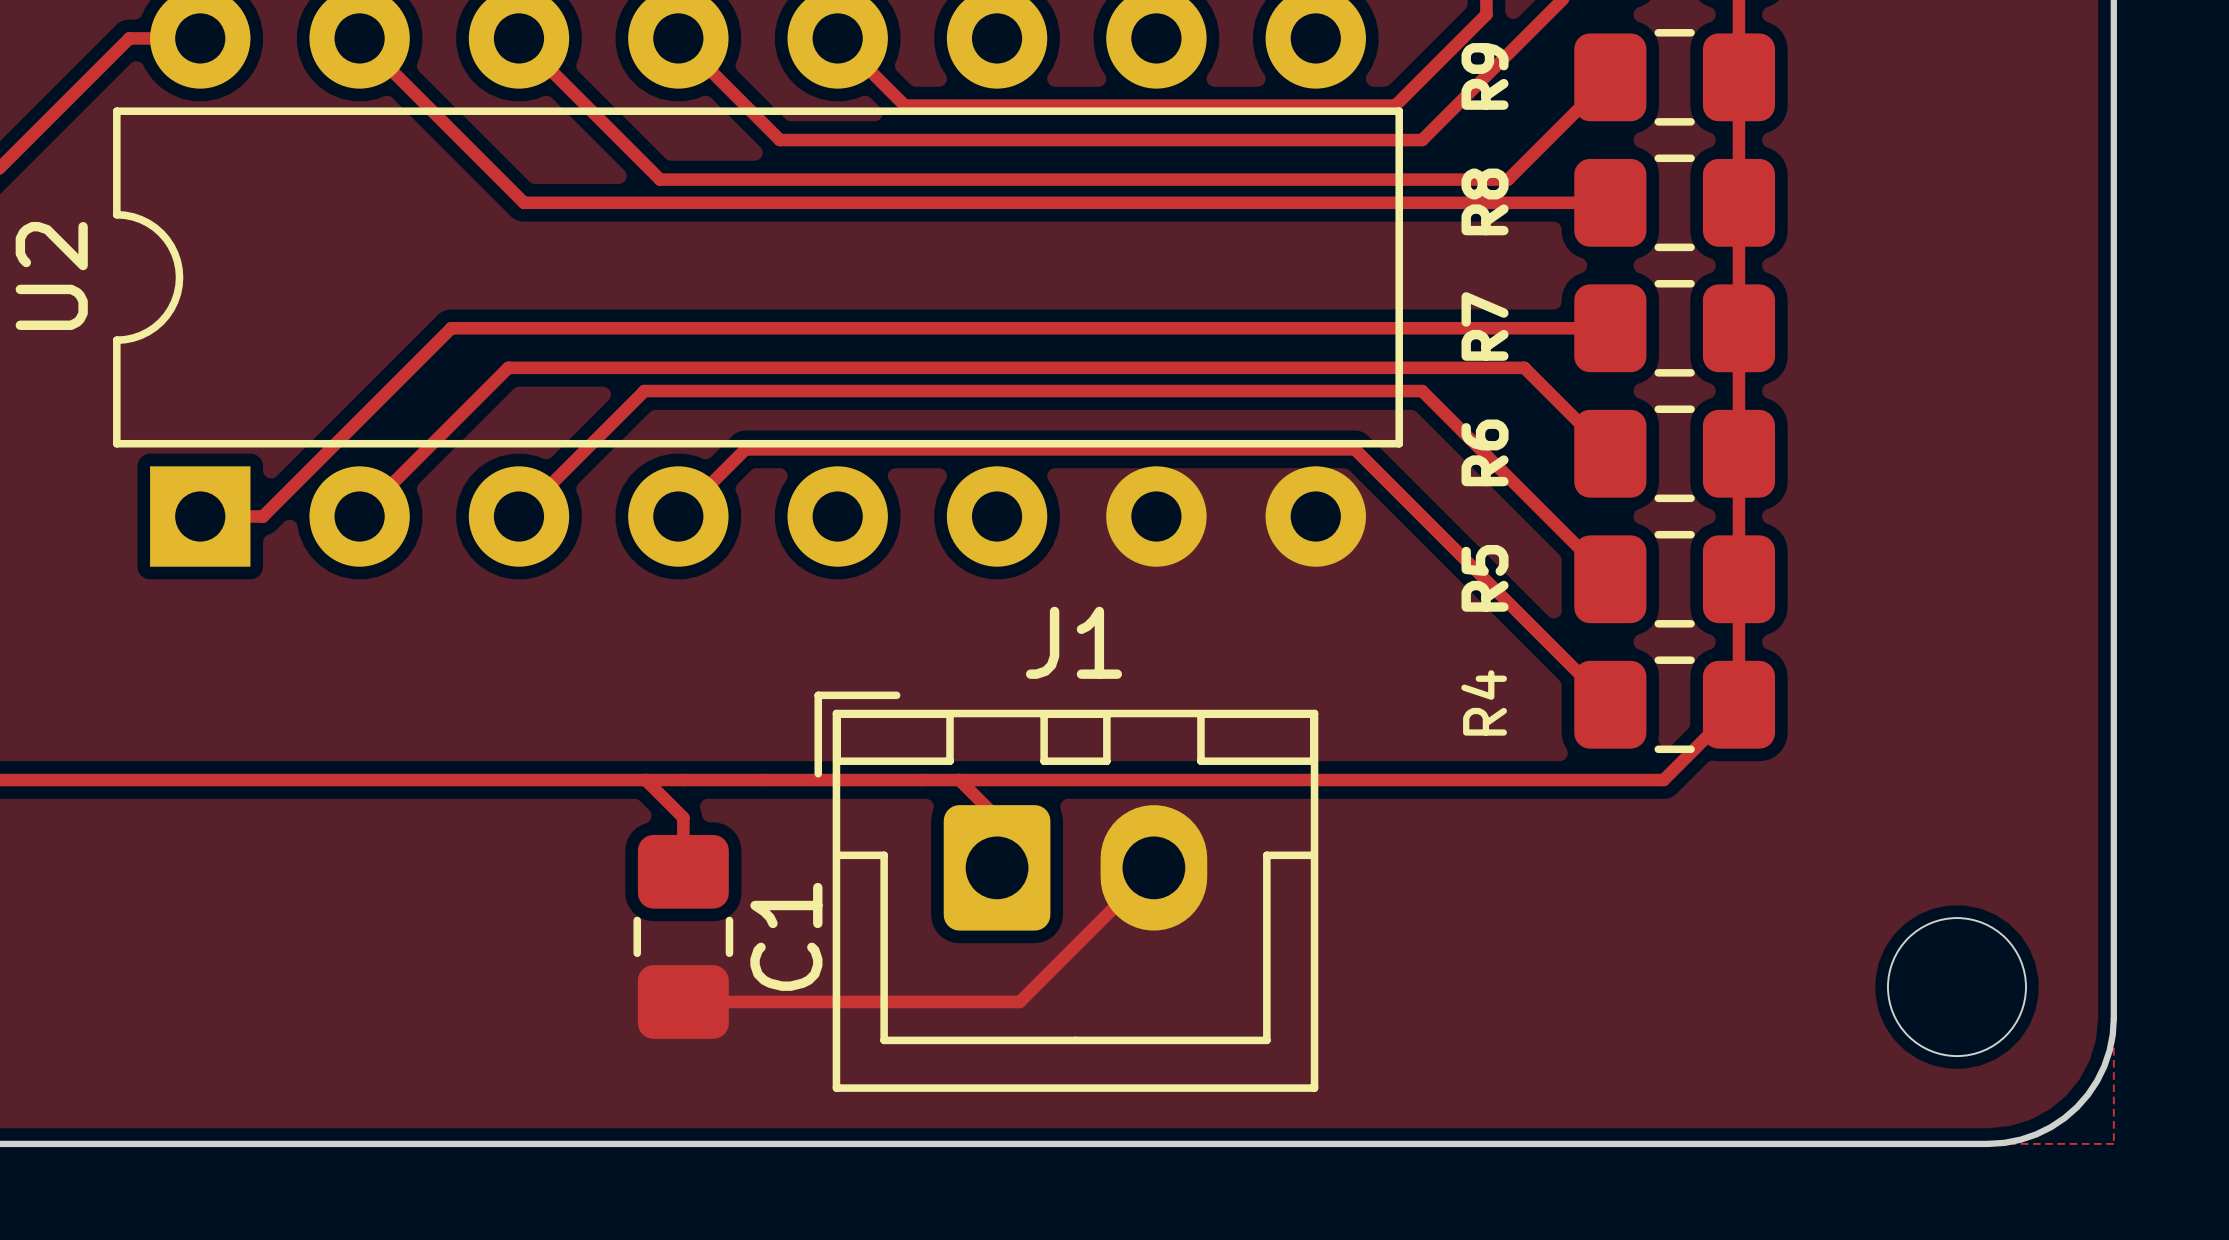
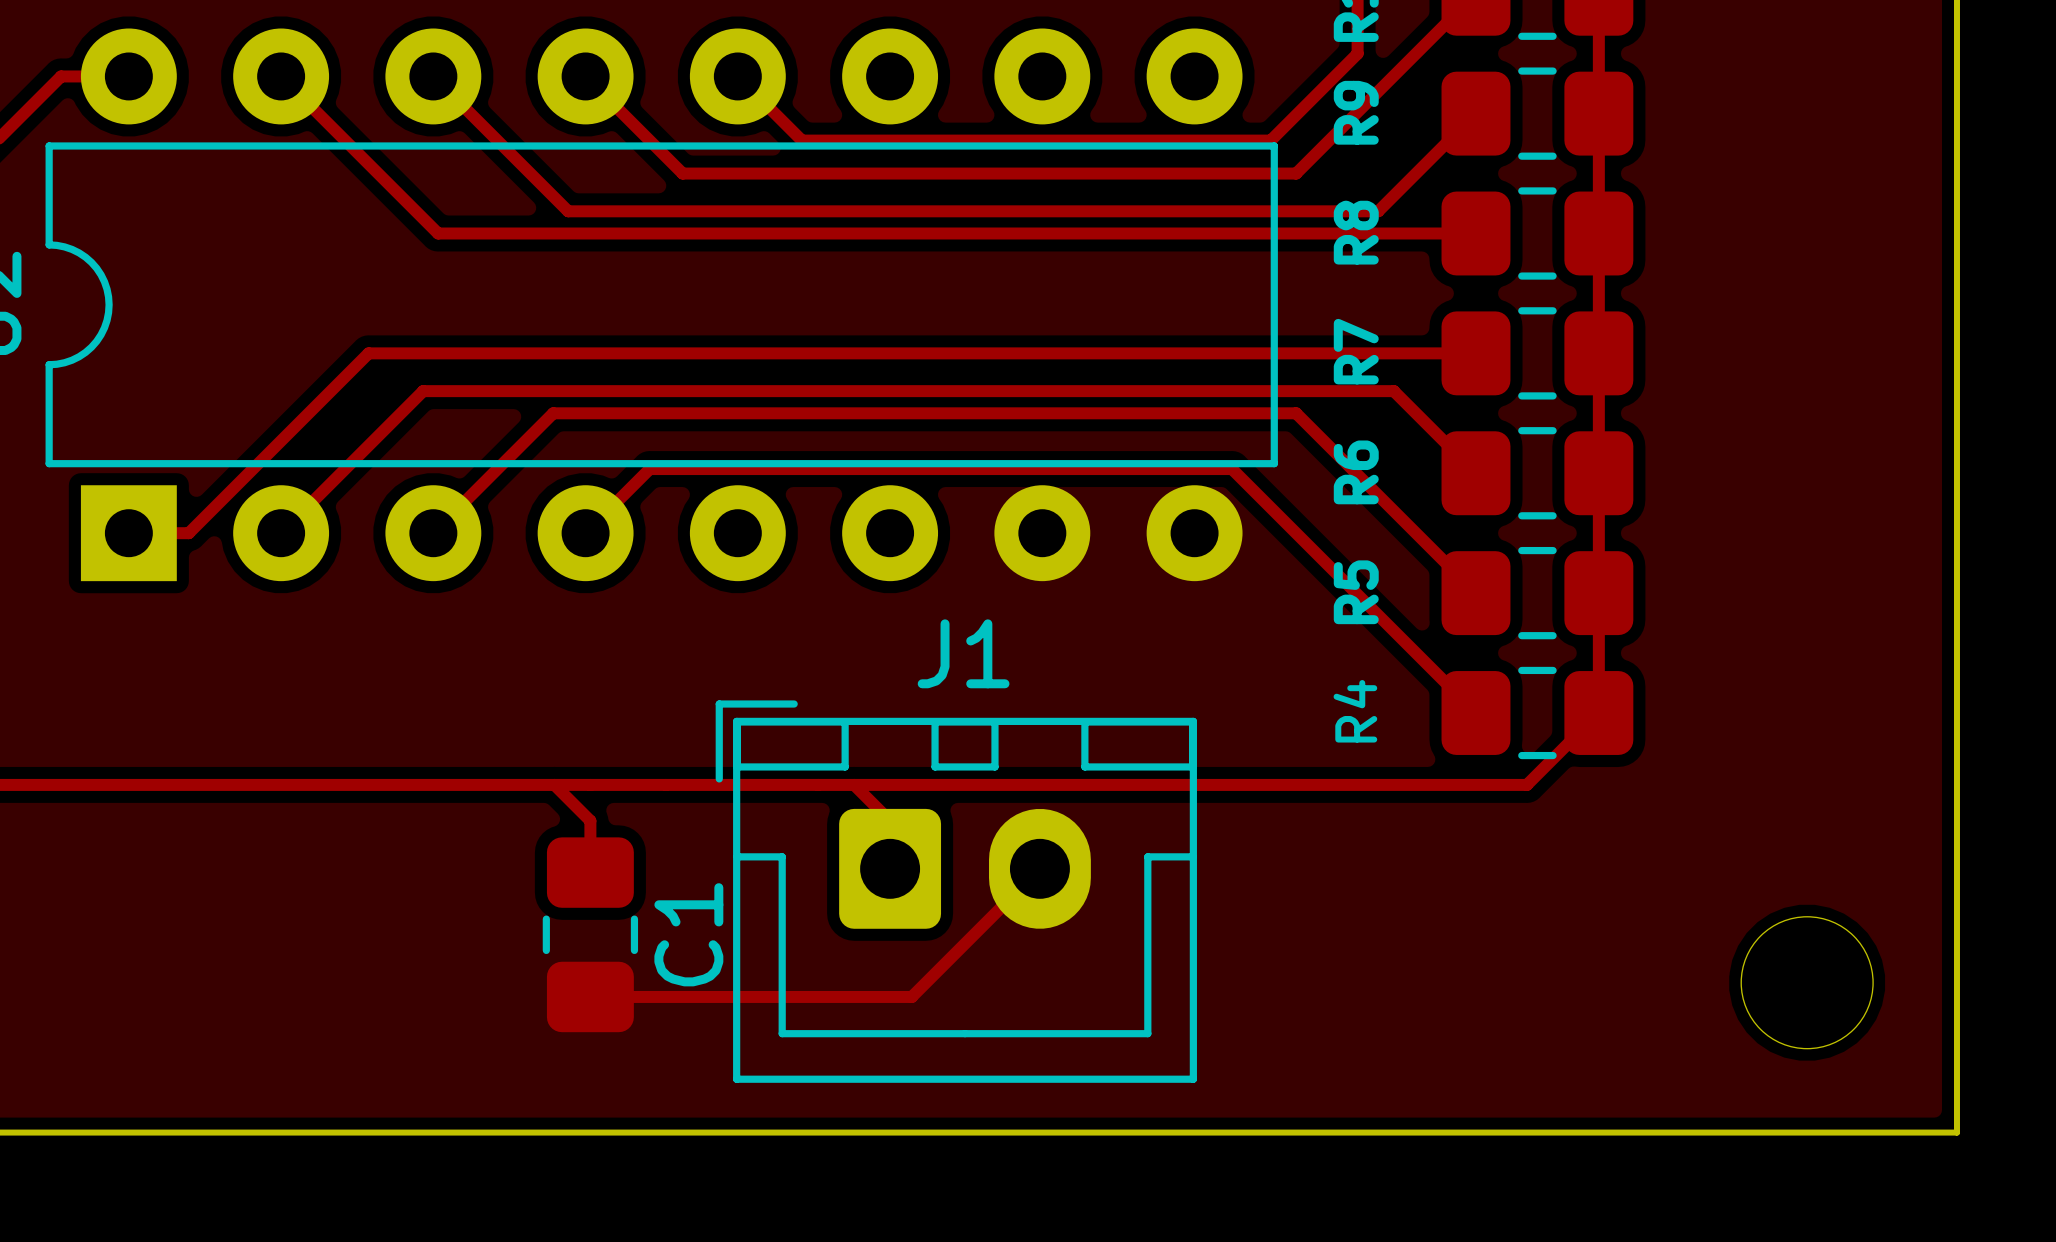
board edge: (2113, 1018) (2109, 1050) (2104, 1066) (2087, 1094) (2077, 1107) (2064, 1117) (2036, 1134) (2020, 1139) (1988, 1143) -> (1956, 1012) (1956, 1132) (1837, 1132)

